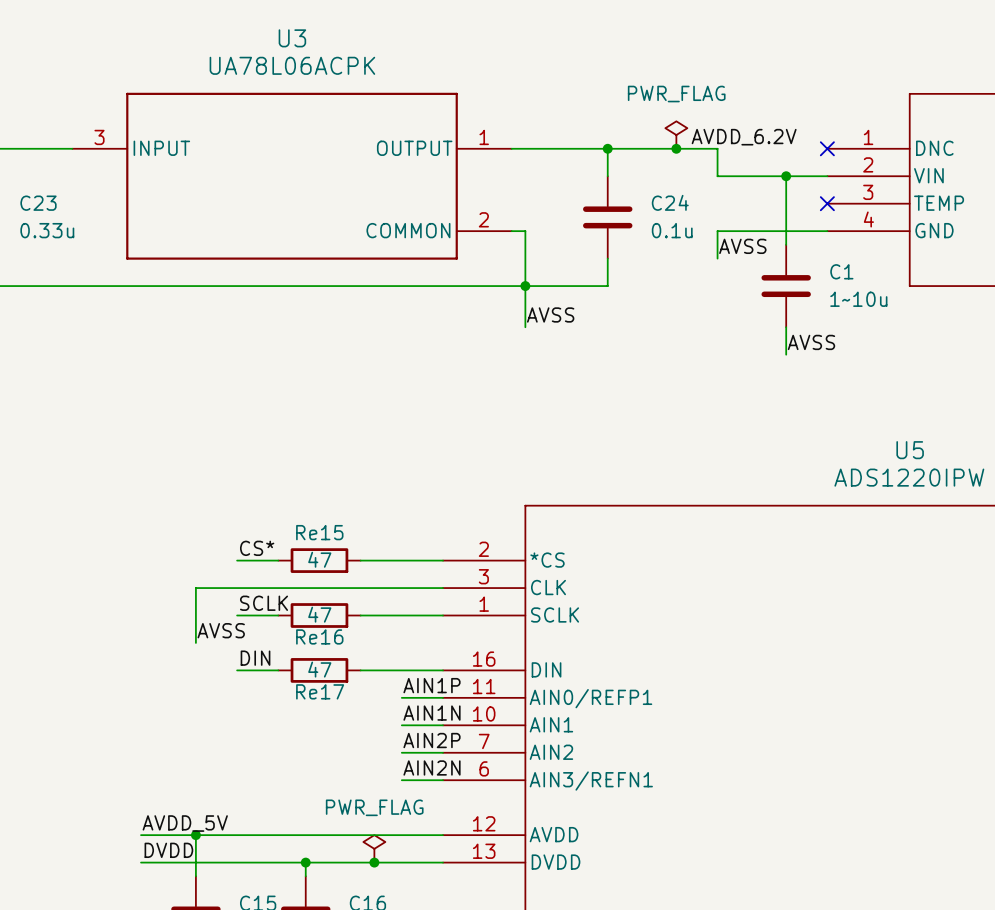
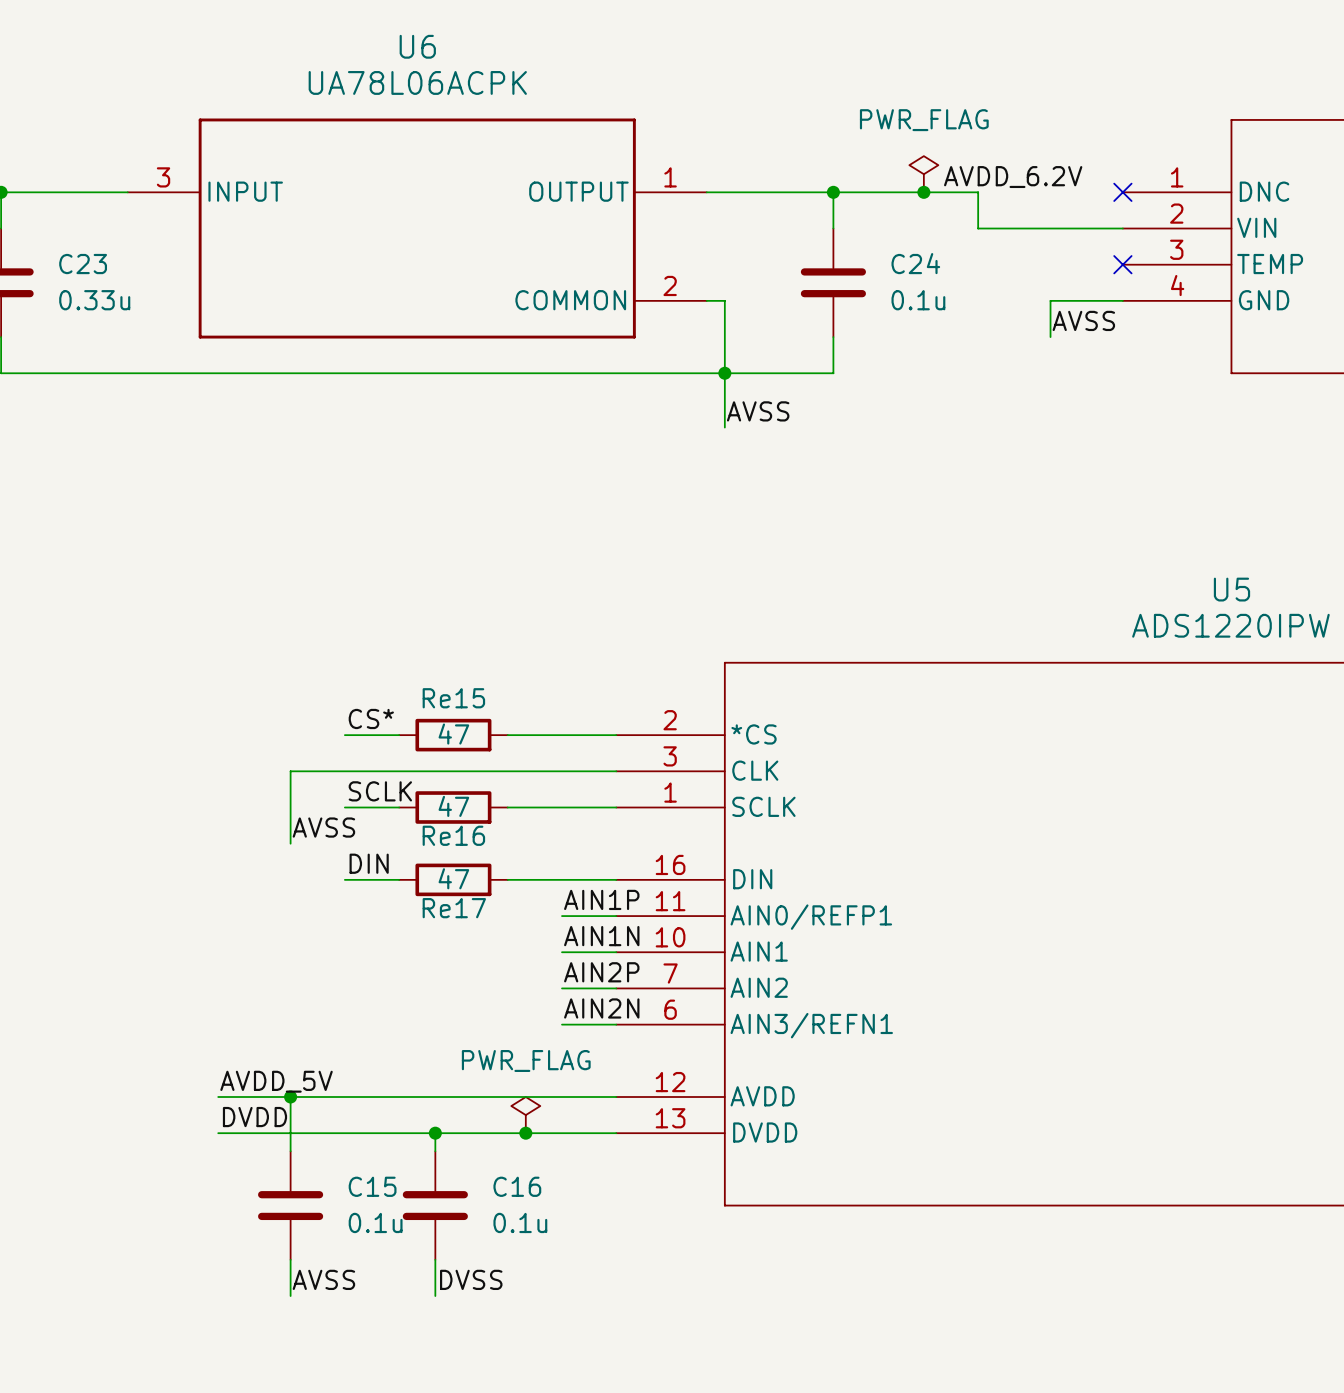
U3 name: U3 (292, 38) -> U6 (417, 46)
wire: (786, 176) (786, 244) -> none
junction: (786, 176) -> none
wire: (772, 231) (717, 231) (717, 258) -> (1050, 300) (1050, 337)
label position: AVSS (742, 246) -> AVSS (1083, 320)
C1: 1~10u (786, 286) -> none
wire: (786, 327) (786, 354) -> none
label: AVSS (811, 342) -> none

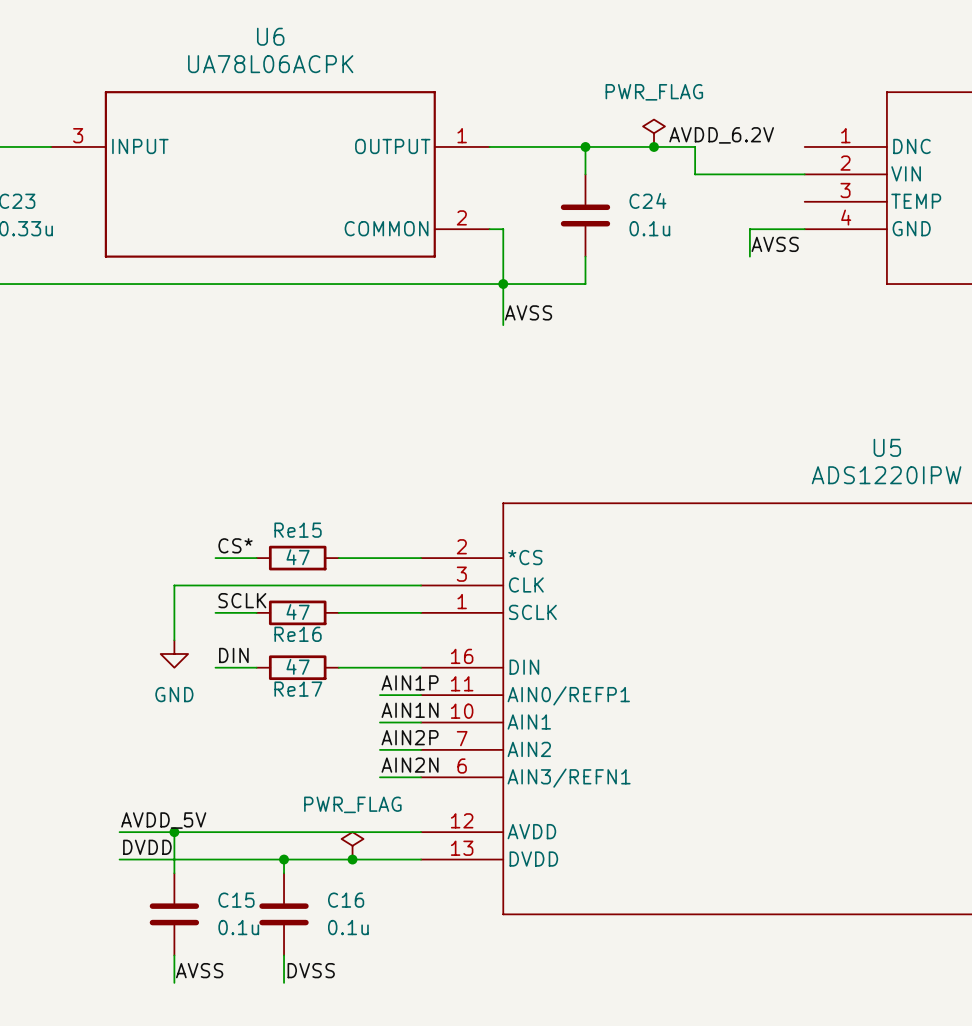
no-connect mark: (1122, 192) -> none
no-connect mark: (1122, 264) -> none
label: AVSS (323, 827) -> none
power symbol: none -> GND (174, 654)

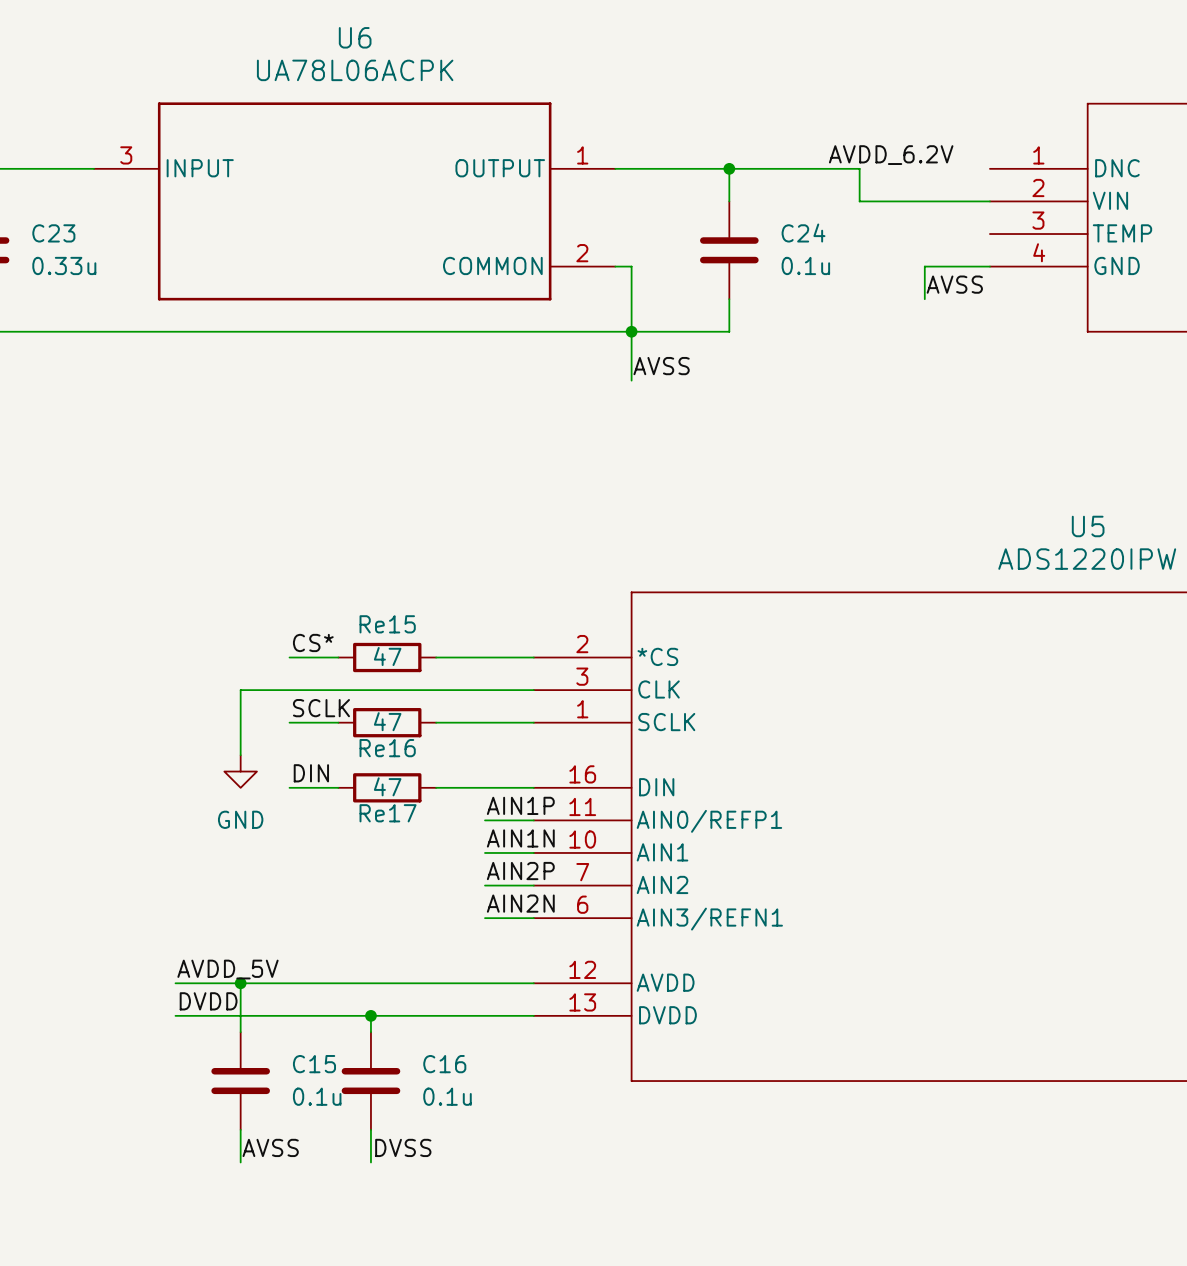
power symbol: PWR_FLAG (654, 133) -> none
junction: (654, 146) -> none
power symbol: PWR_FLAG (352, 845) -> none
junction: (352, 859) -> none

